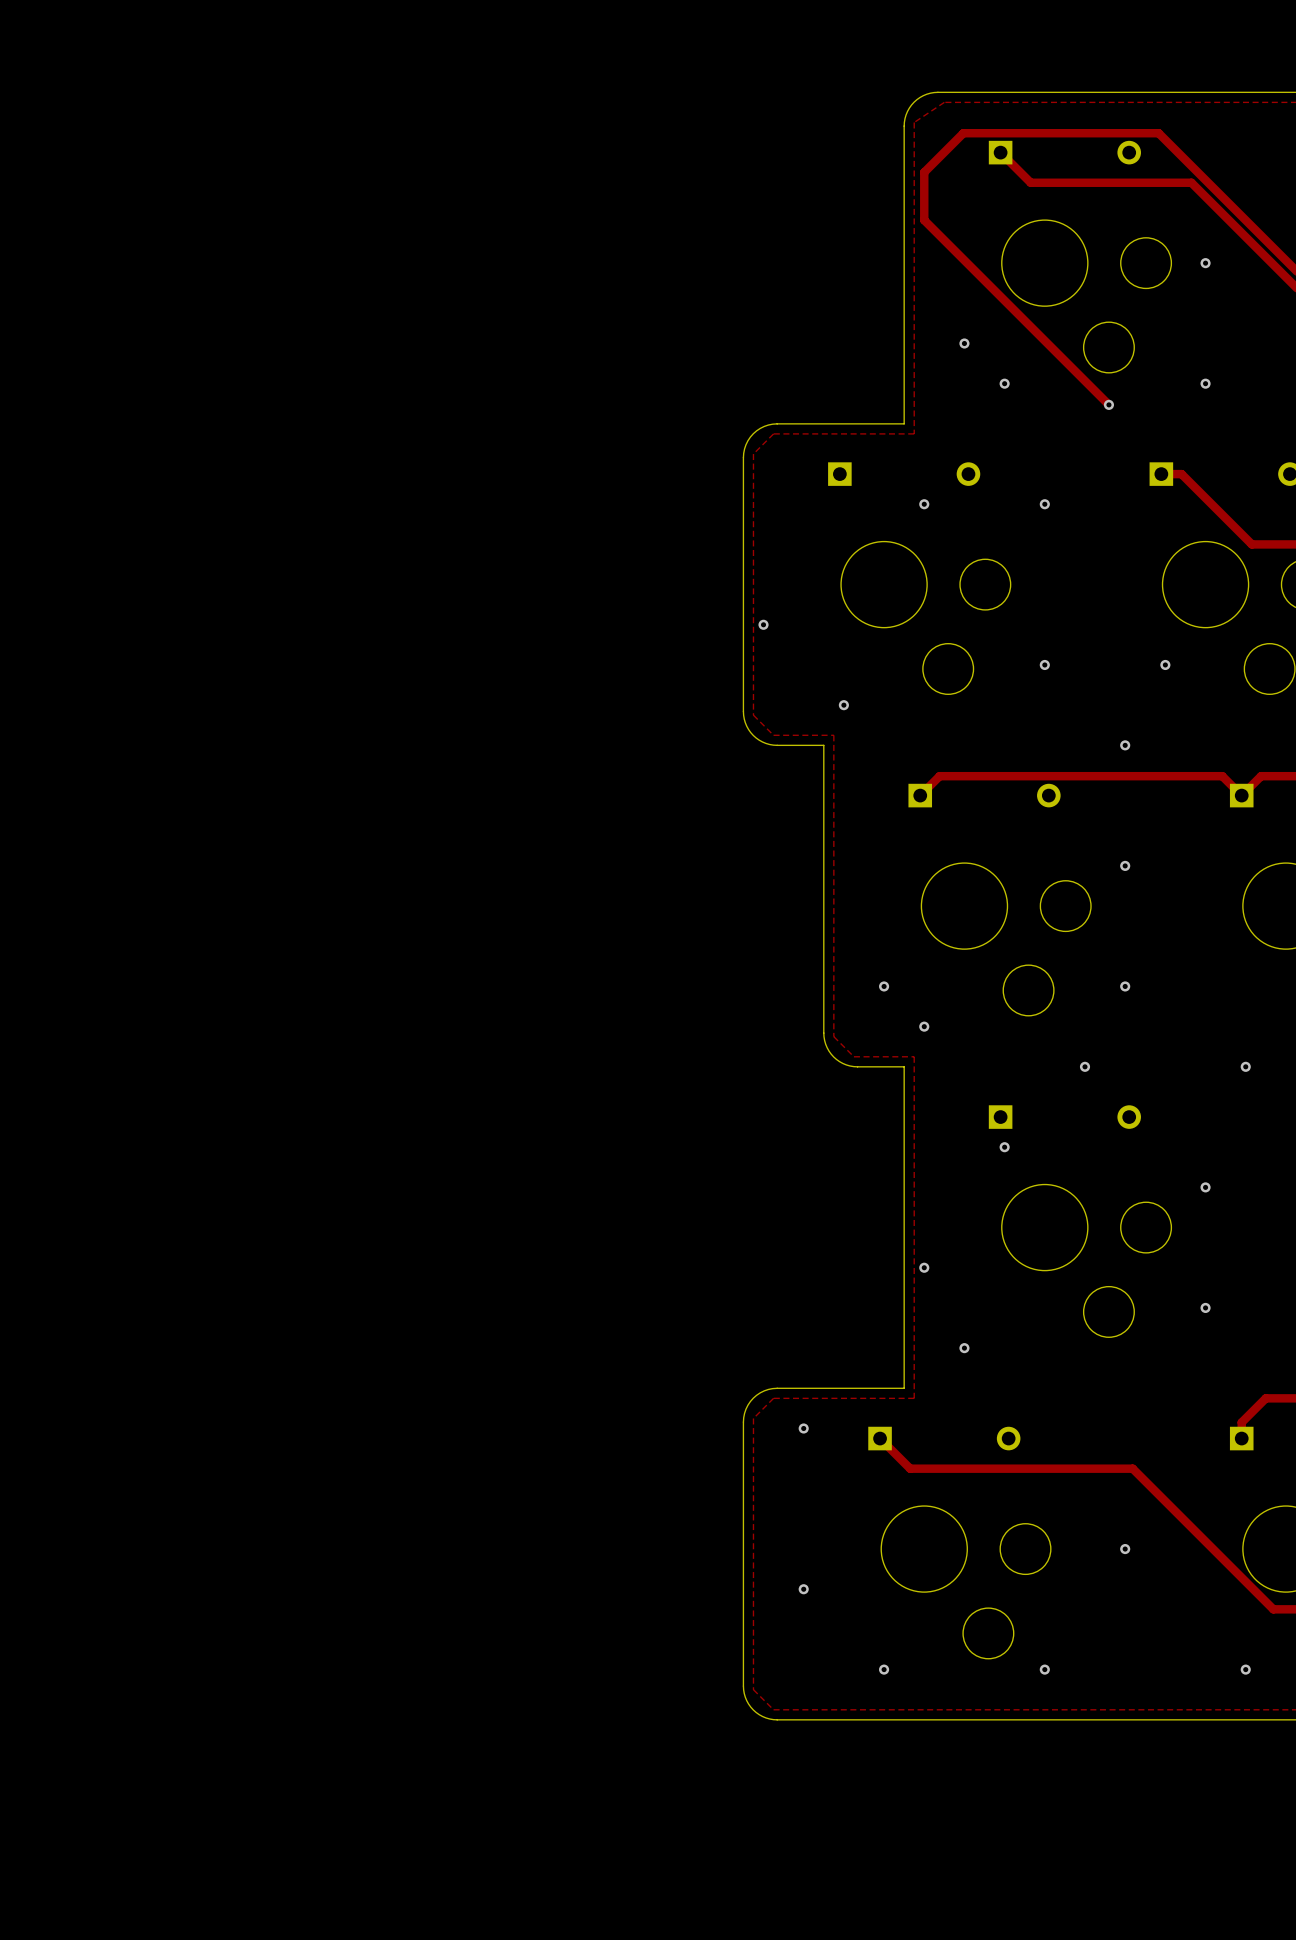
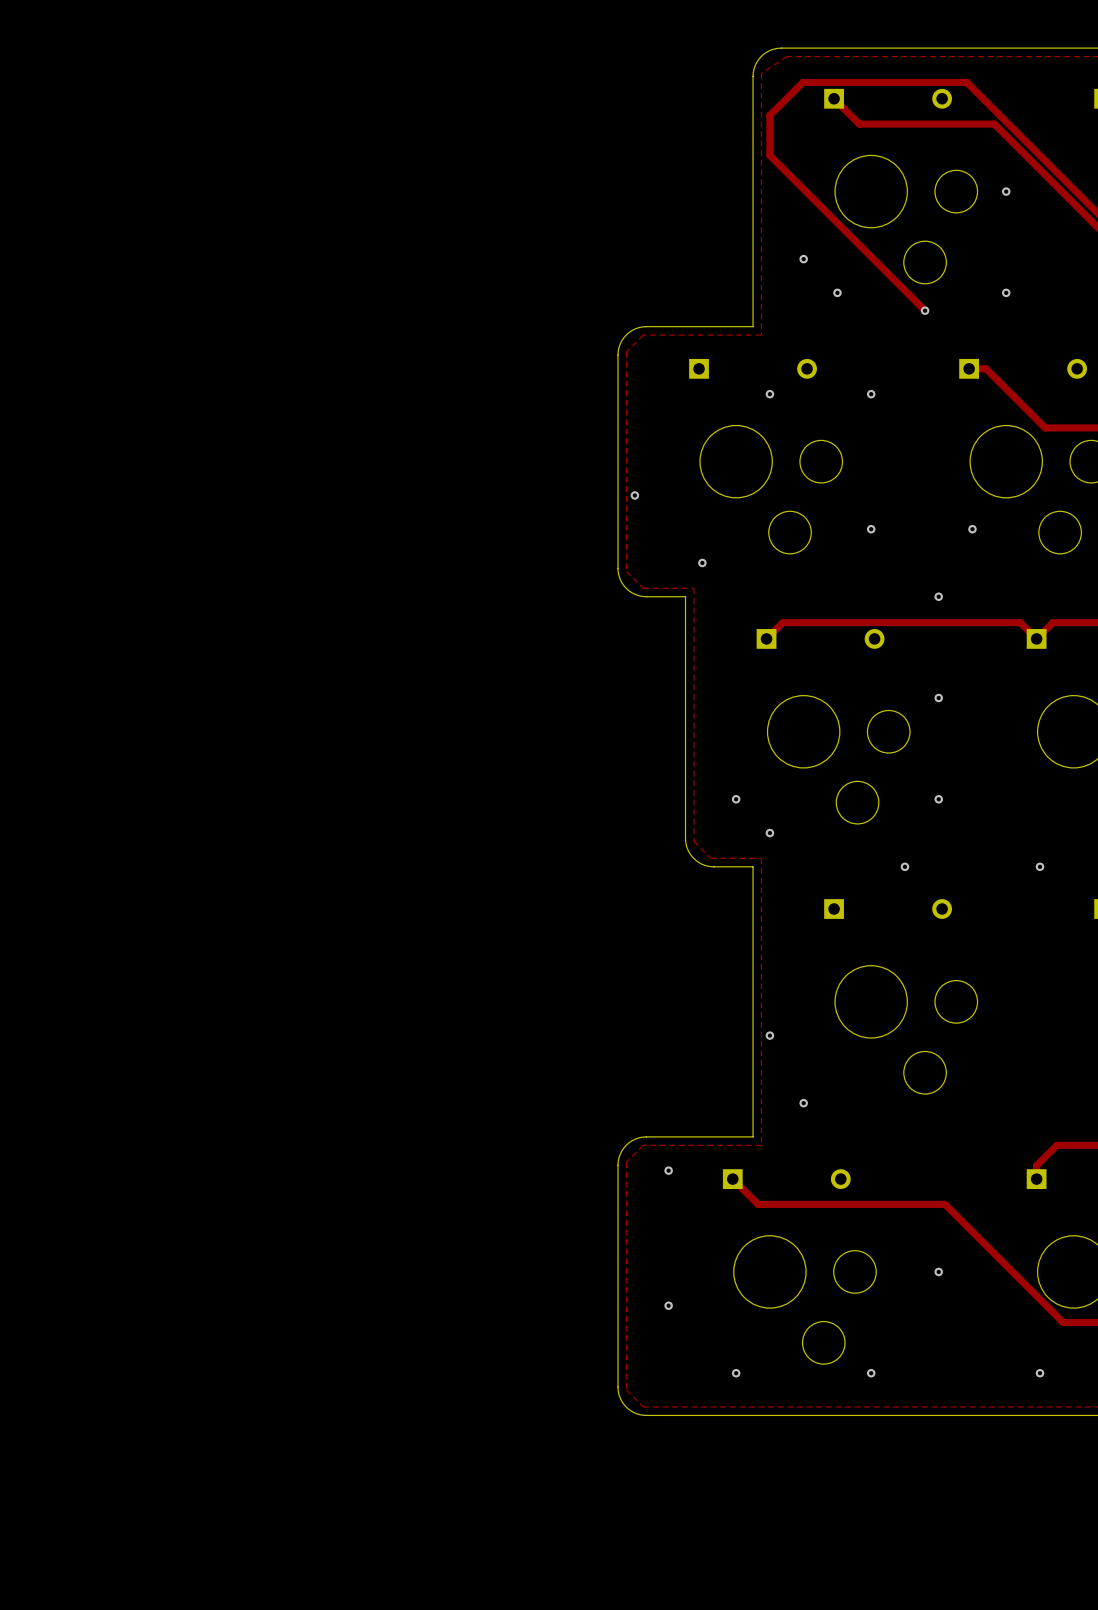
via: (1004, 1147) -> none
via: (1205, 1187) -> none
via: (1205, 1307) -> none

